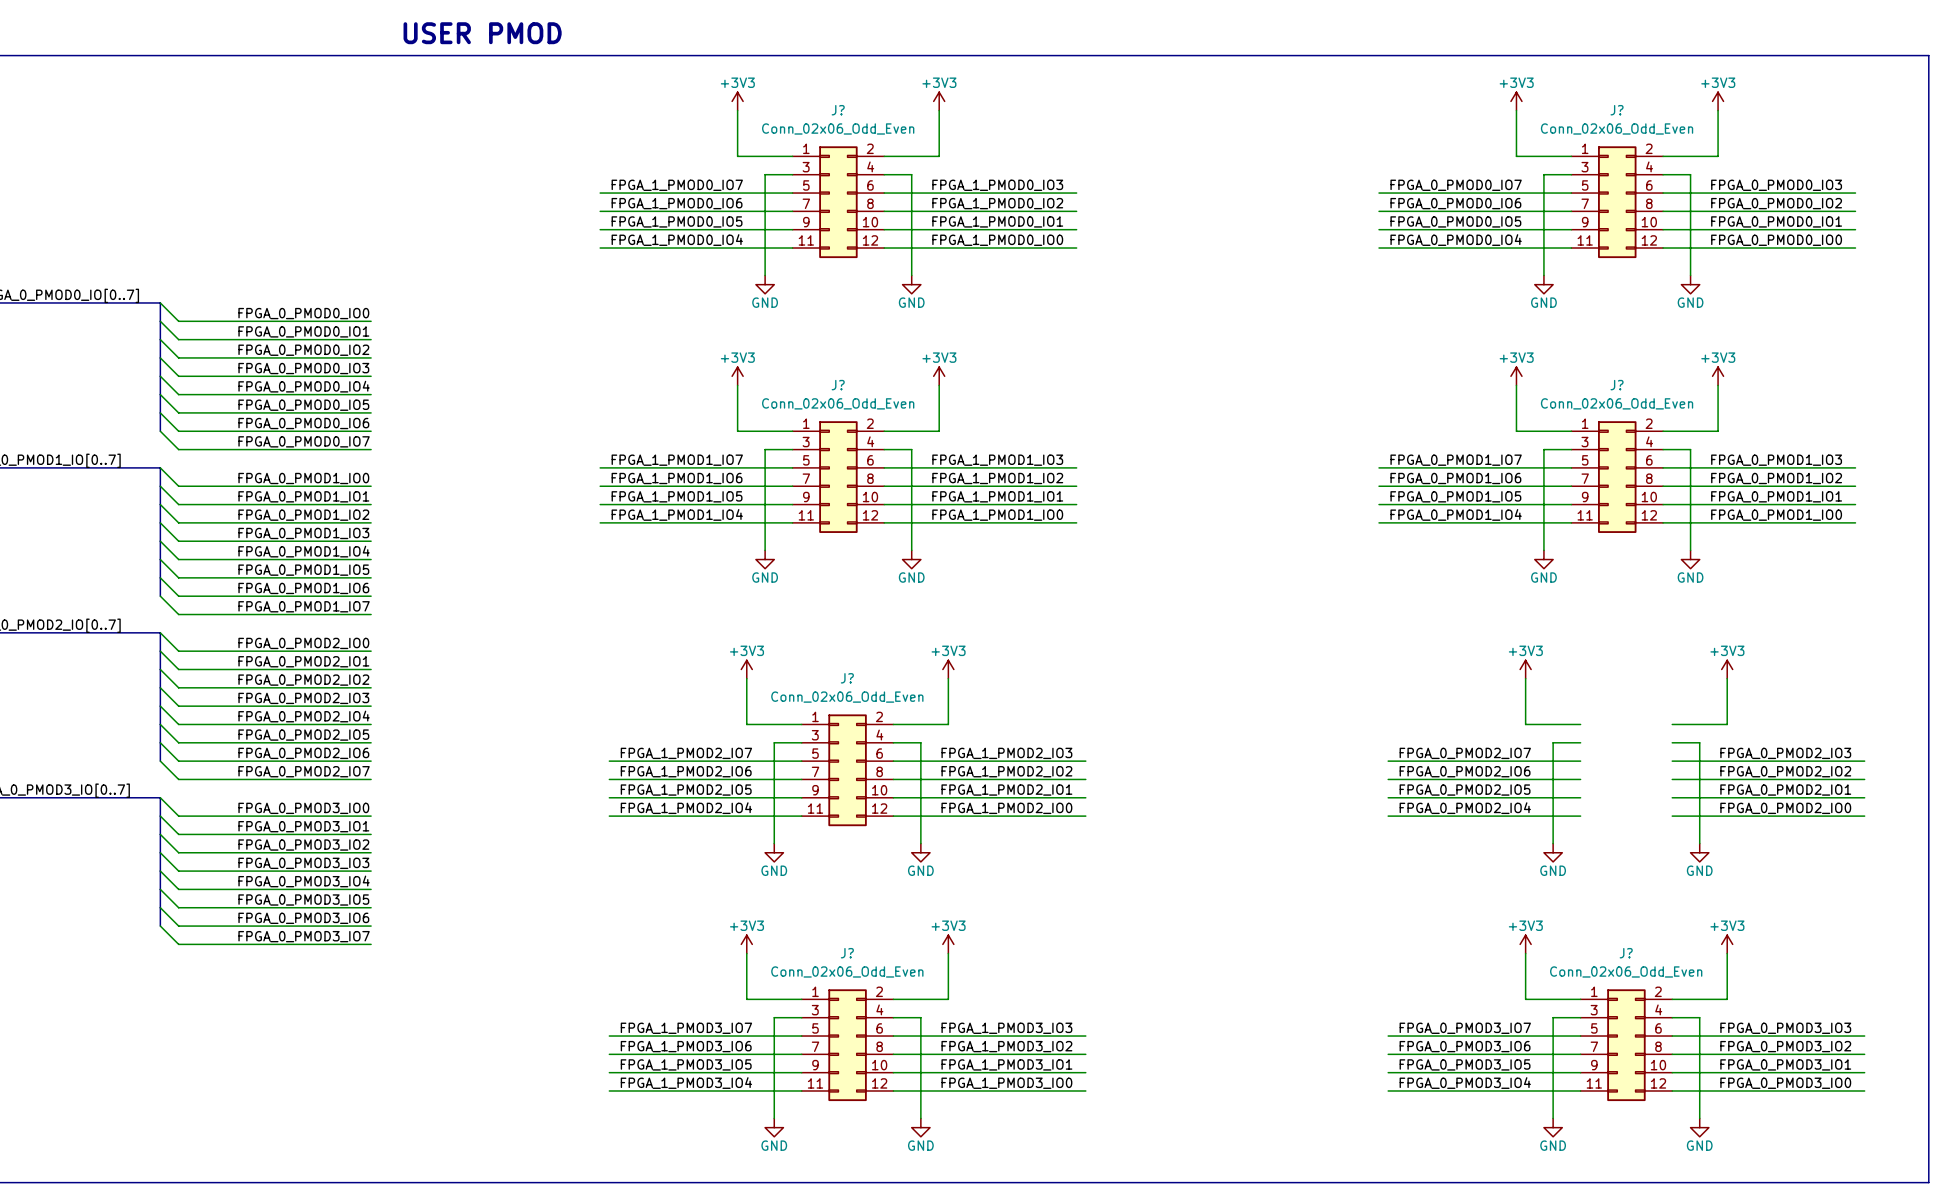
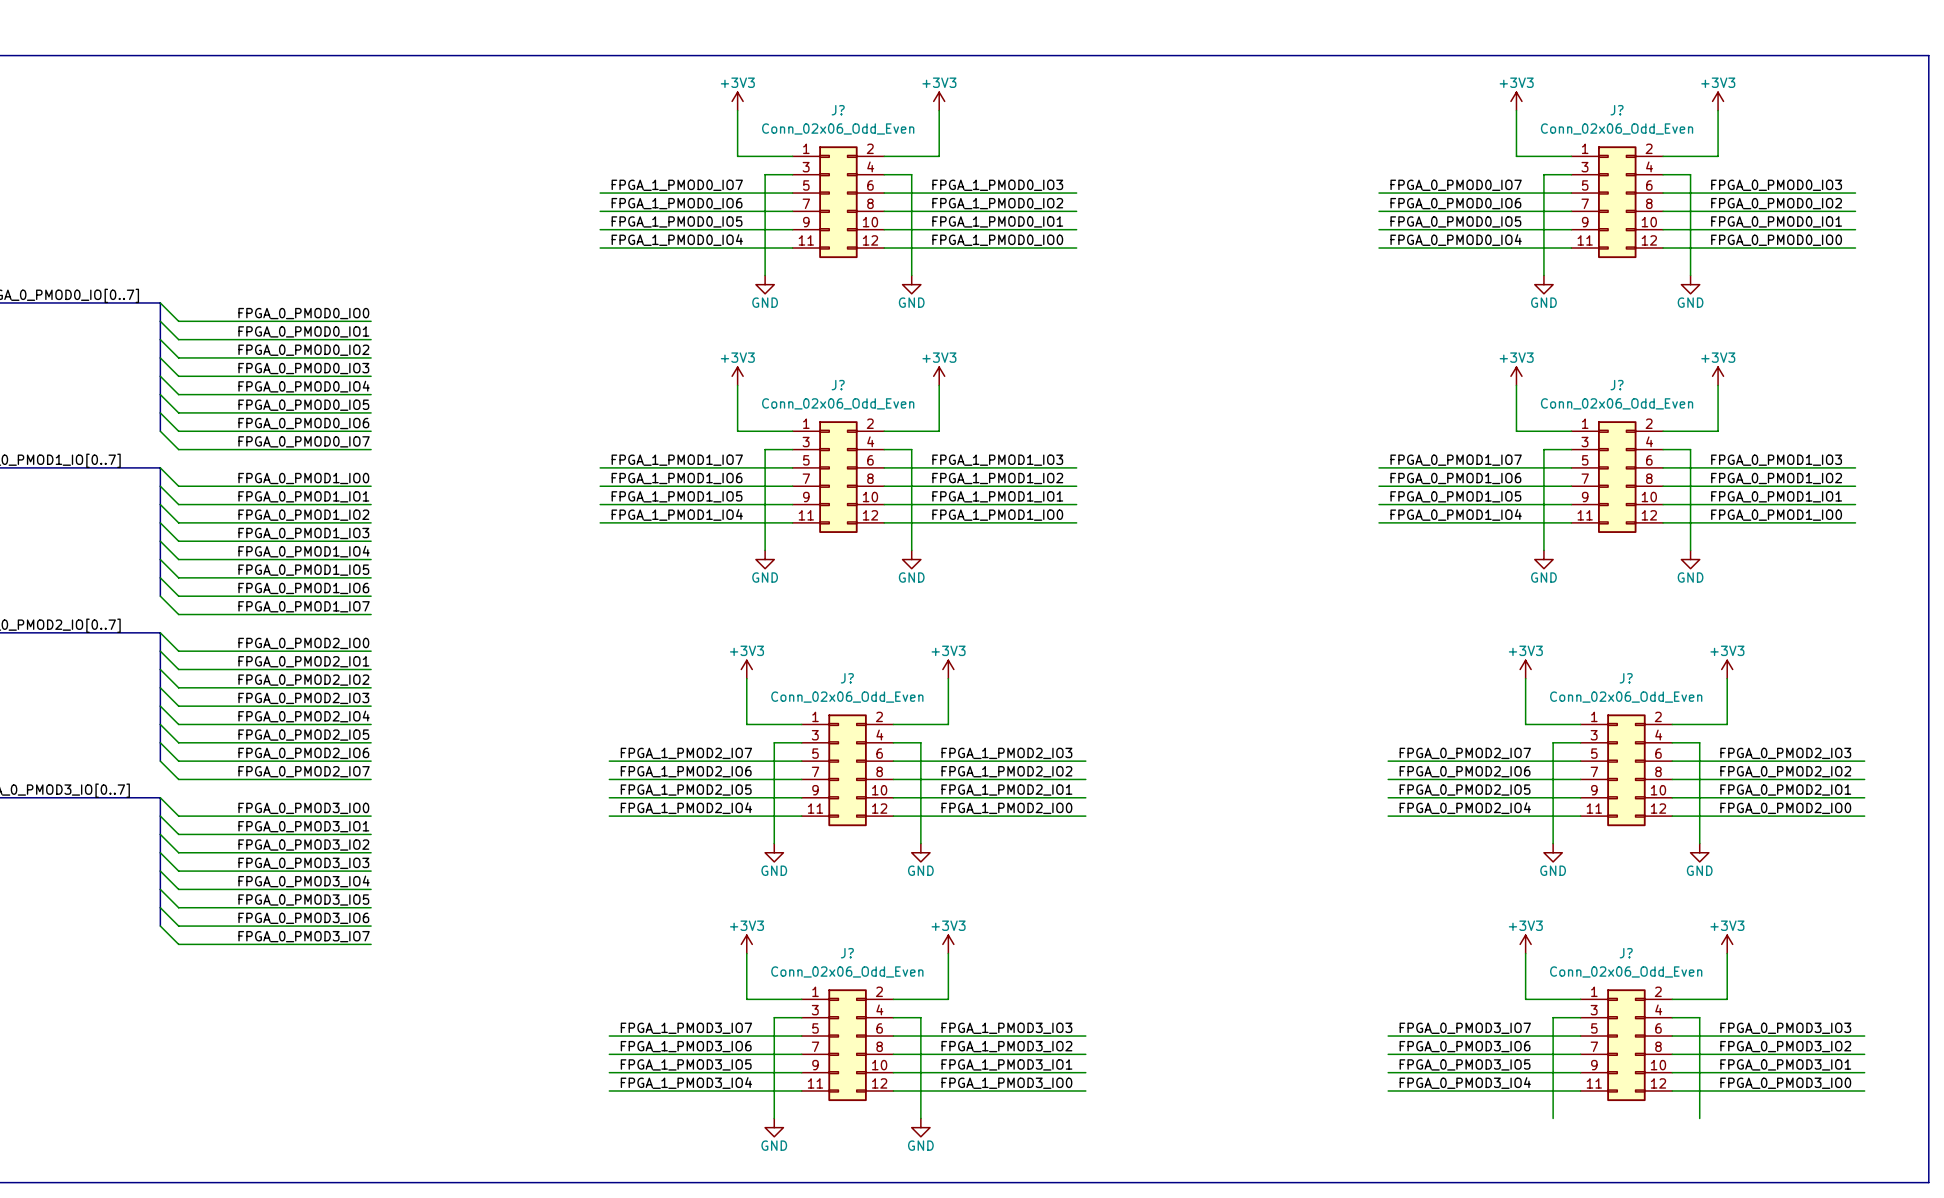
text: USER PMOD (482, 33) -> none
J?: none -> Conn_02x06_Odd_Even (1626, 770)
power symbol: GND (1553, 1127) -> none
power symbol: GND (1699, 1127) -> none

